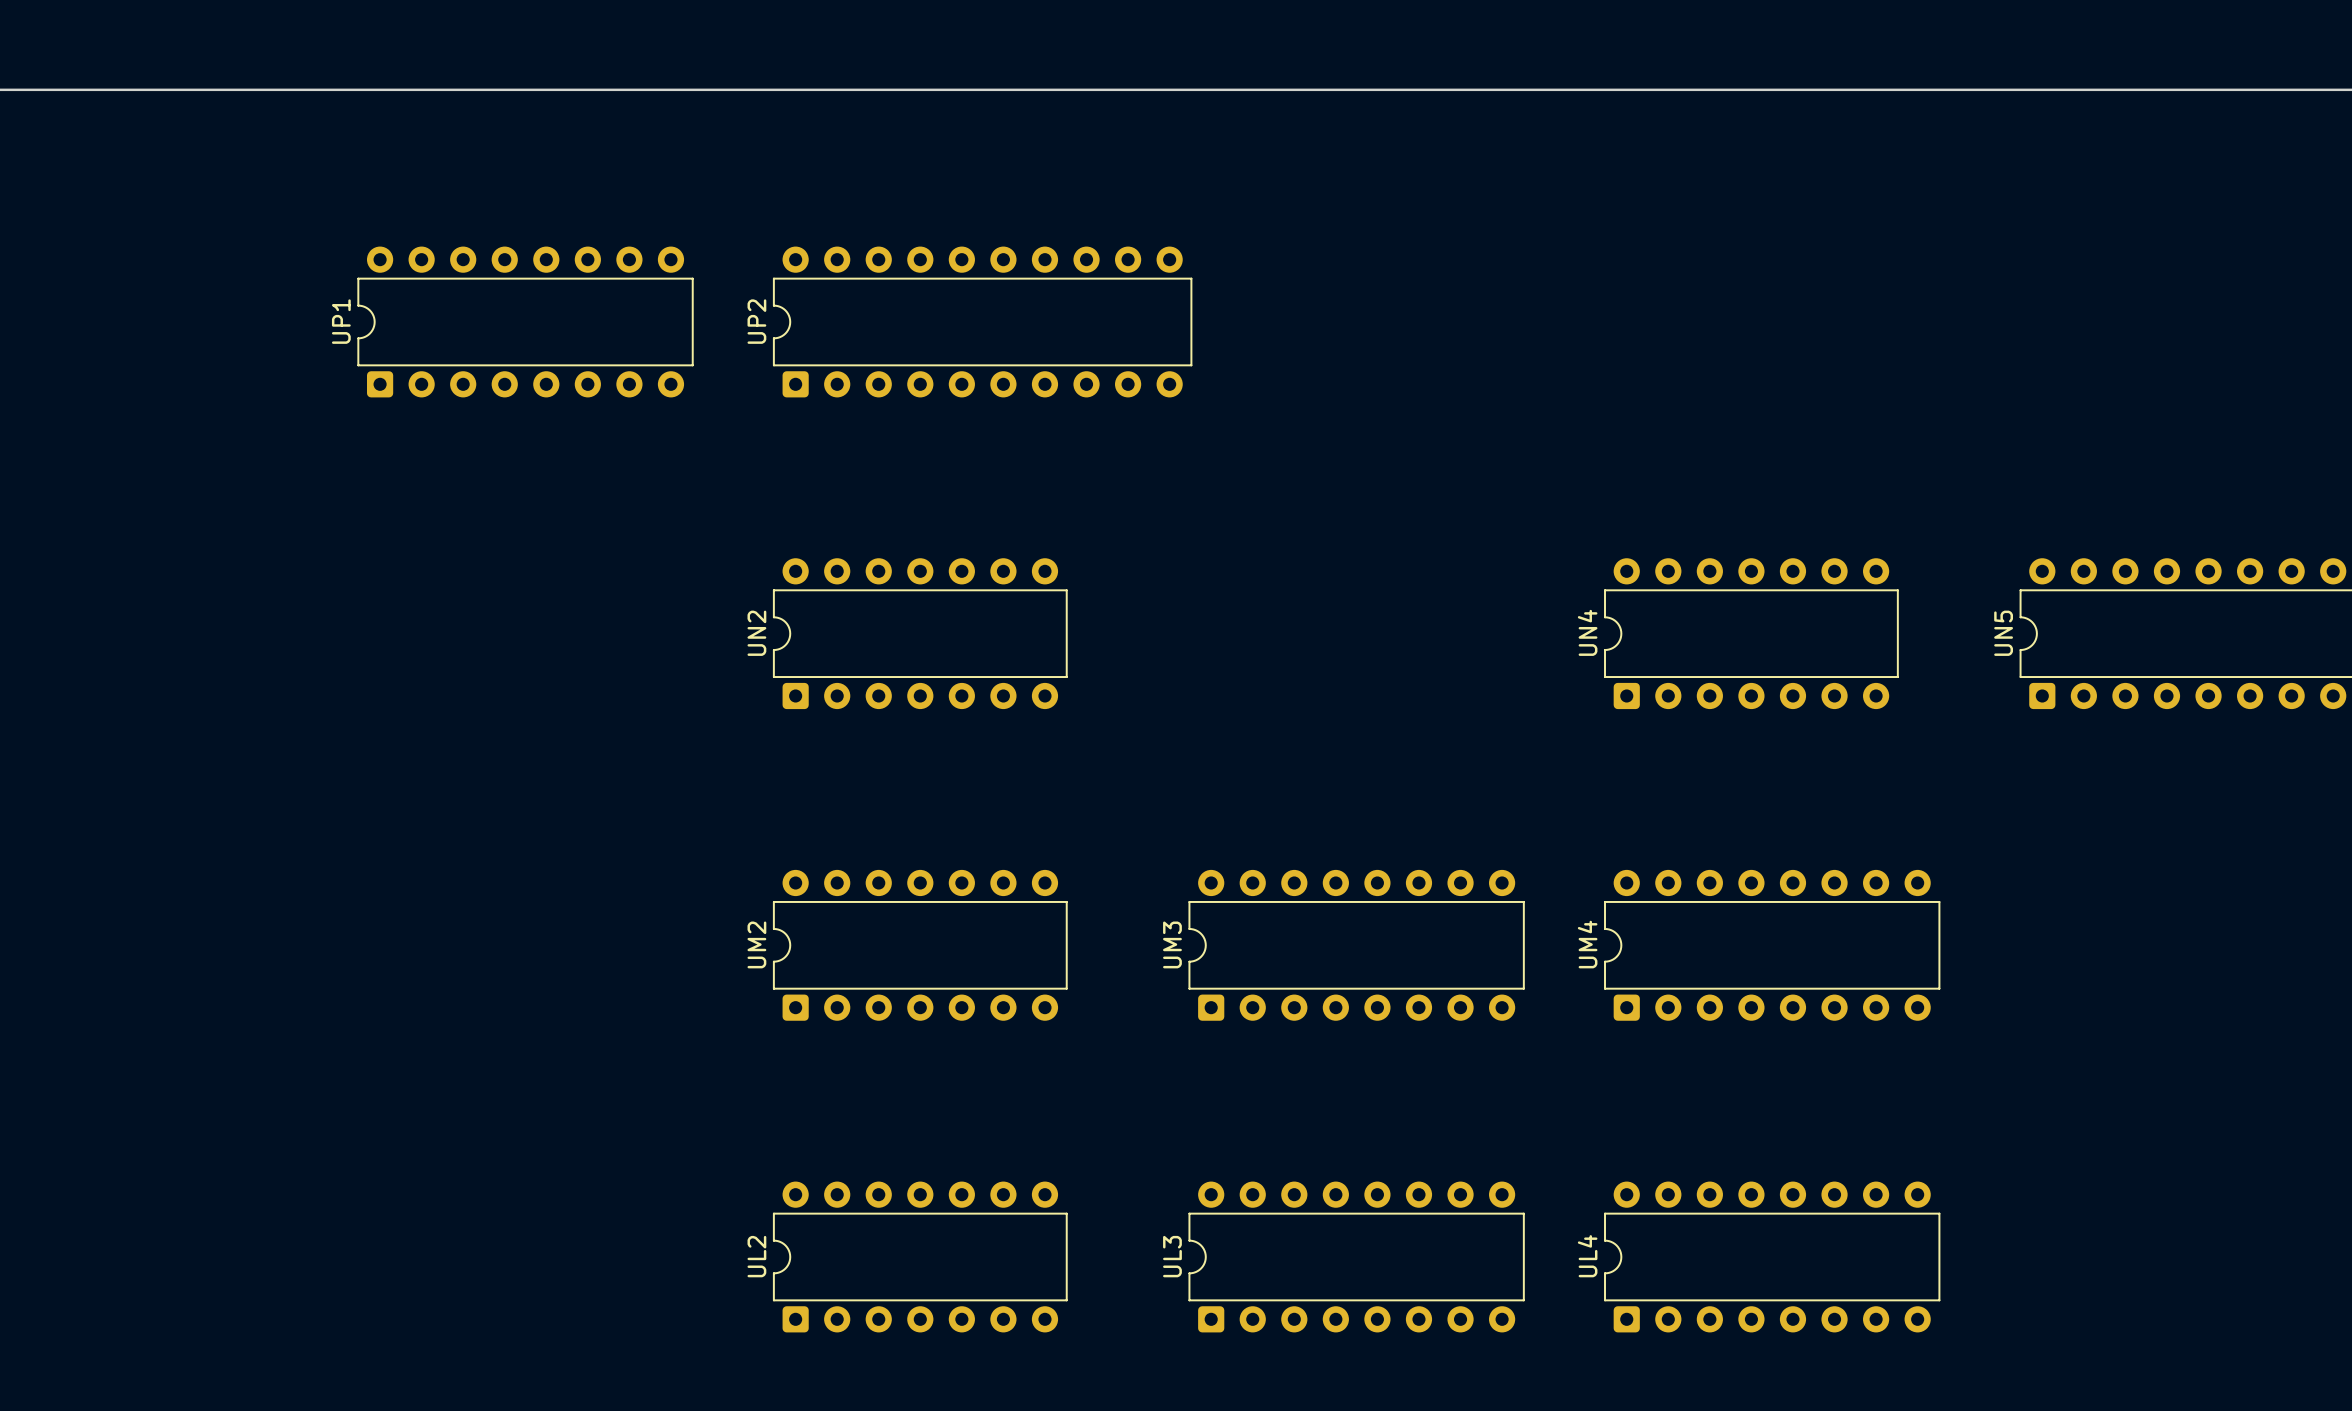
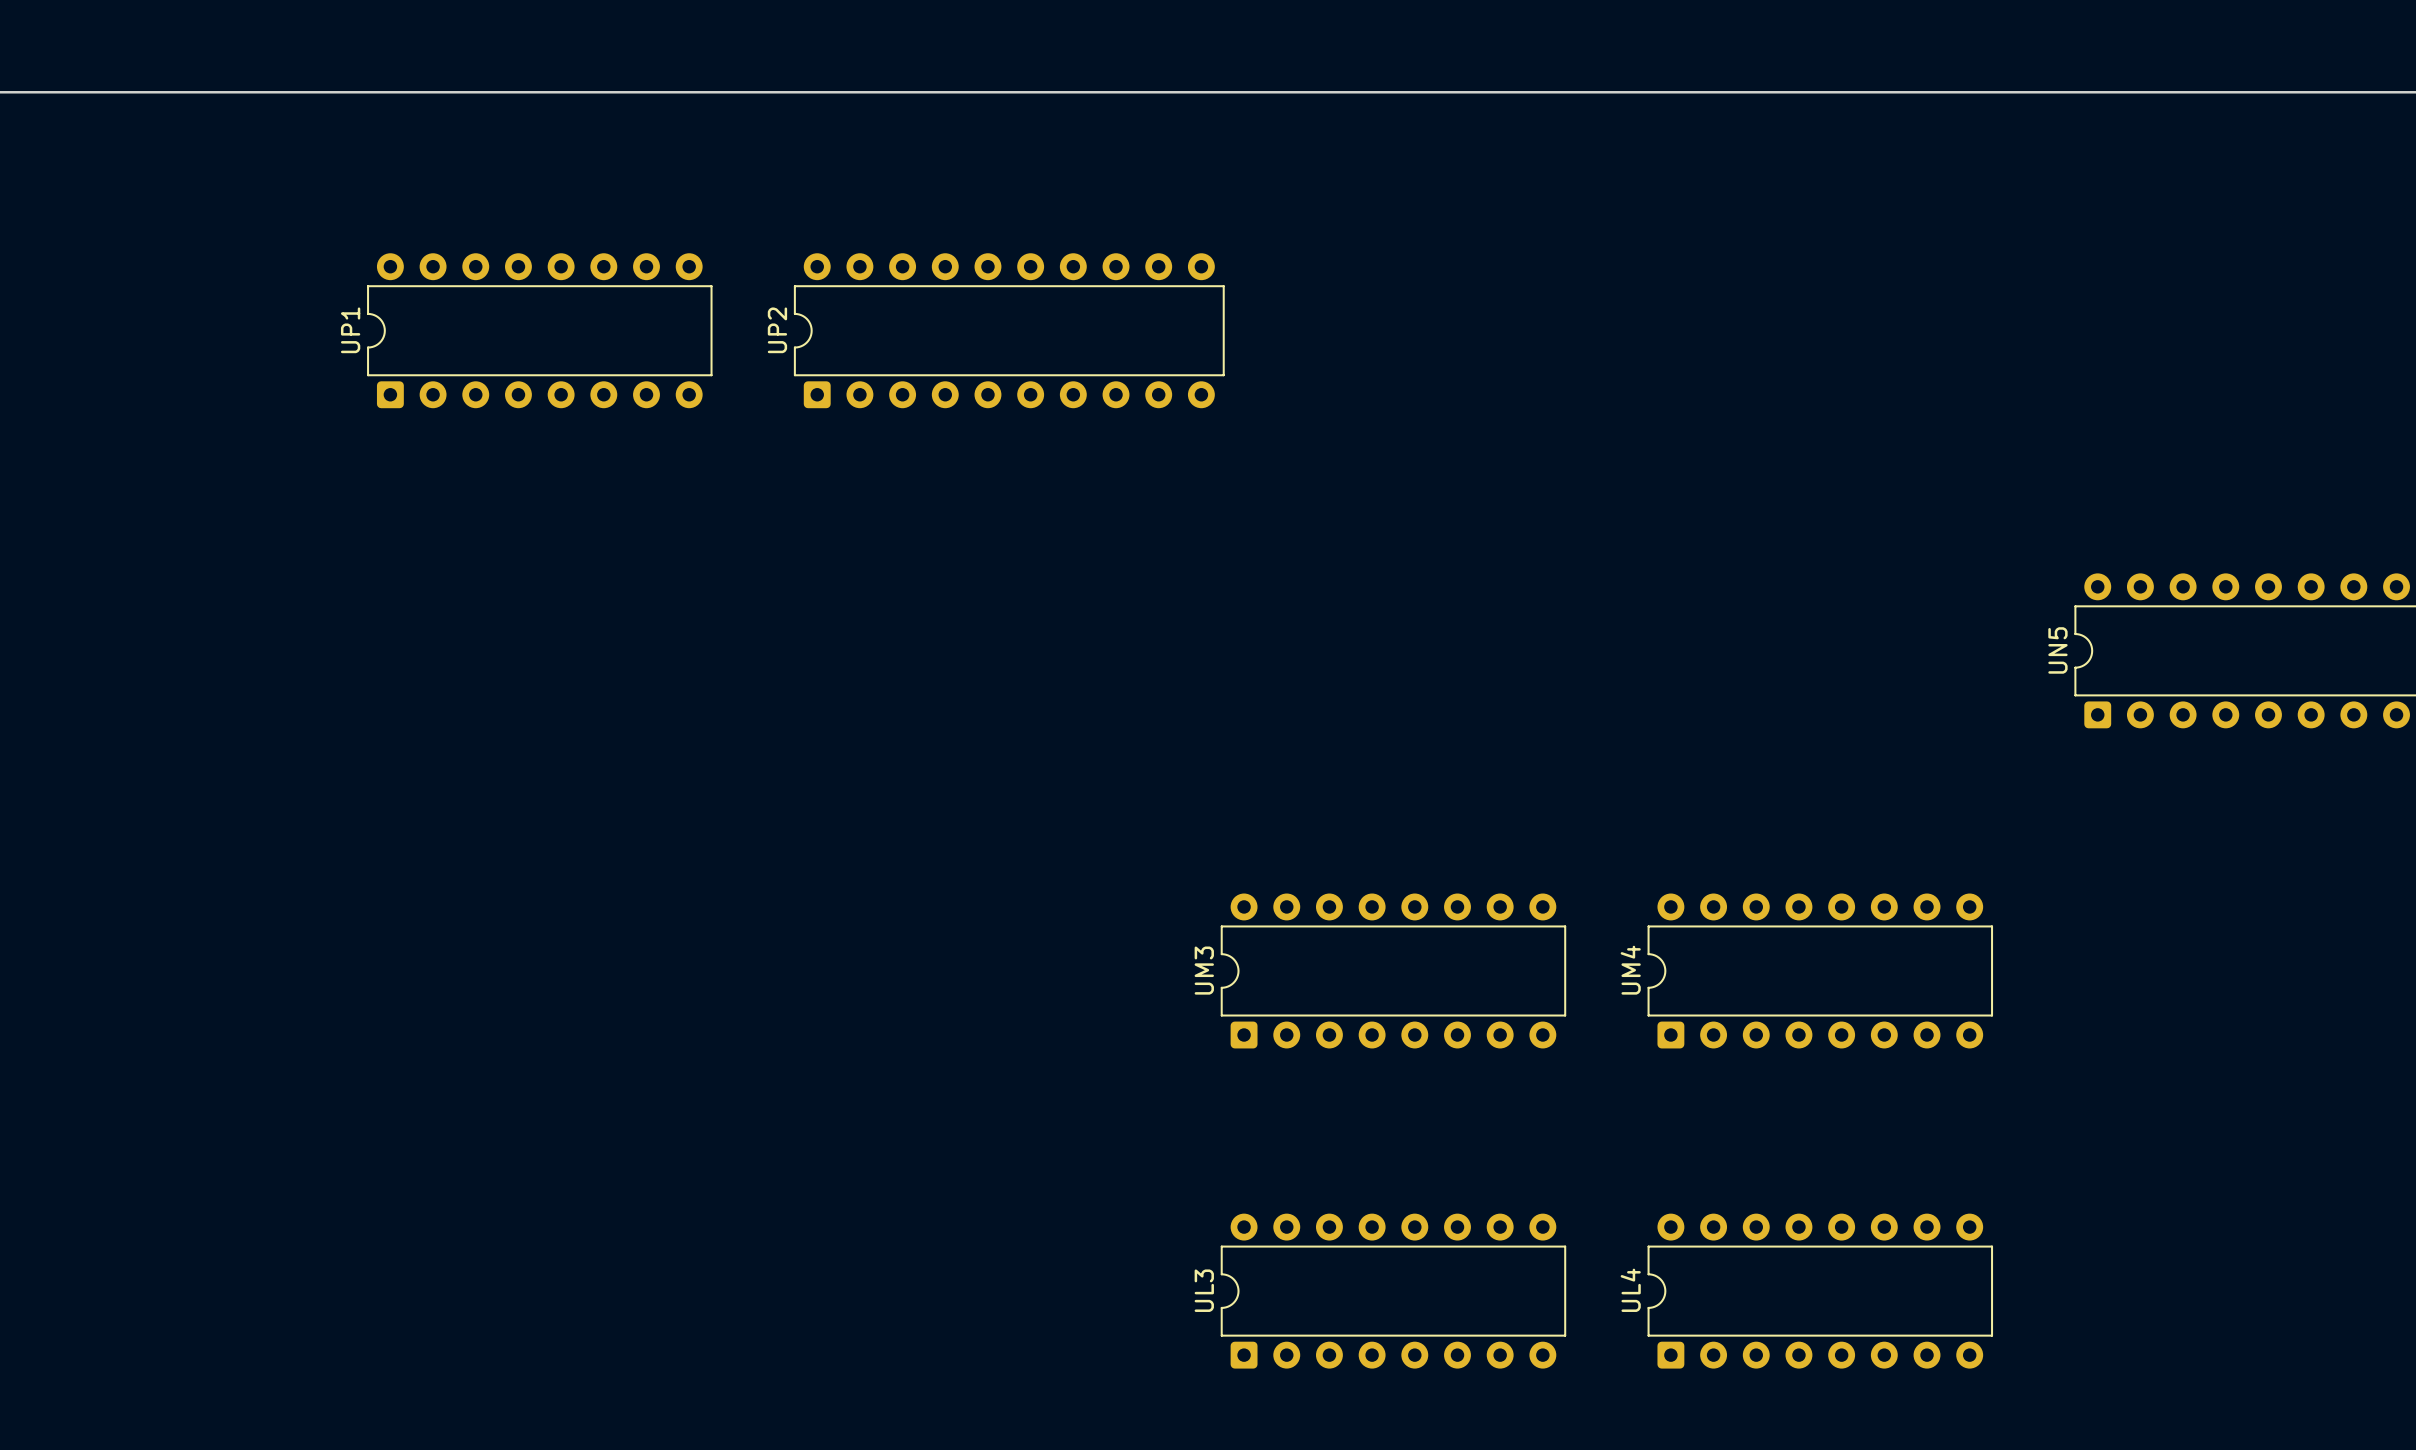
UN2: (920, 633) -> none
UN4: (1751, 633) -> none
UM2: (920, 945) -> none
UL2: (920, 1256) -> none

